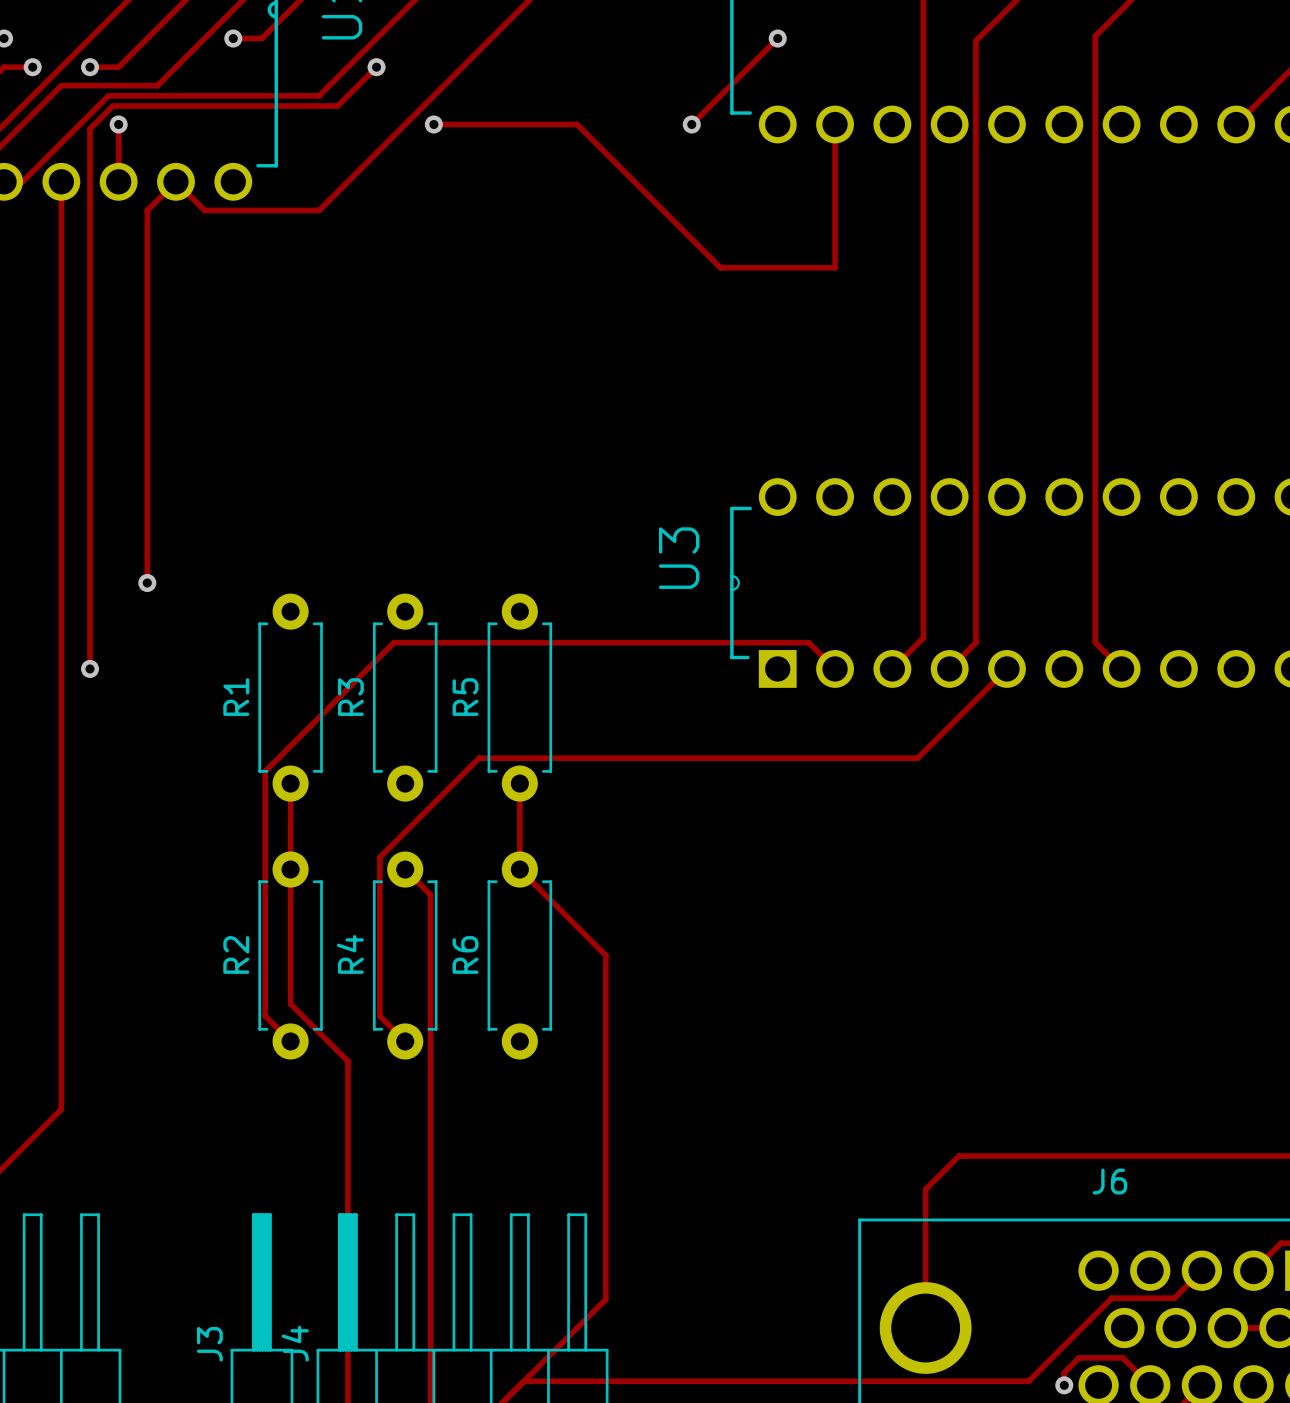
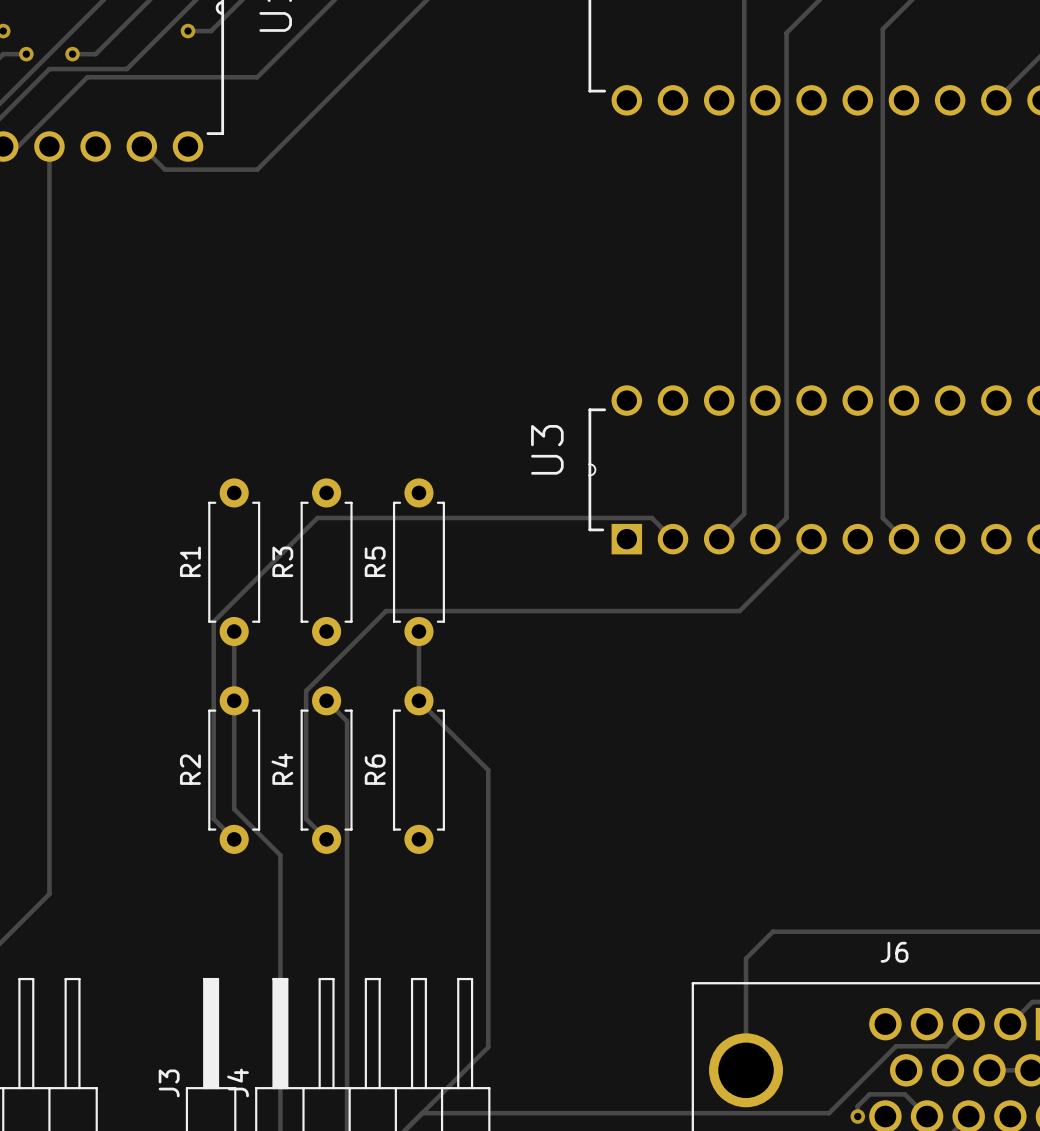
track: (777, 38) (691, 124) -> none
via: (777, 38) -> none
track: (376, 67) (337, 105) (112, 105) (90, 128) (90, 668) -> none
via: (376, 67) -> none
track: (118, 124) (118, 181) -> none
via: (118, 124) -> none
track: (433, 124) (577, 124) (720, 267) (835, 267) (835, 124) -> none
via: (433, 124) -> none
via: (691, 124) -> none
track: (175, 181) (147, 210) (147, 582) -> none
via: (147, 582) -> none
via: (90, 668) -> none

